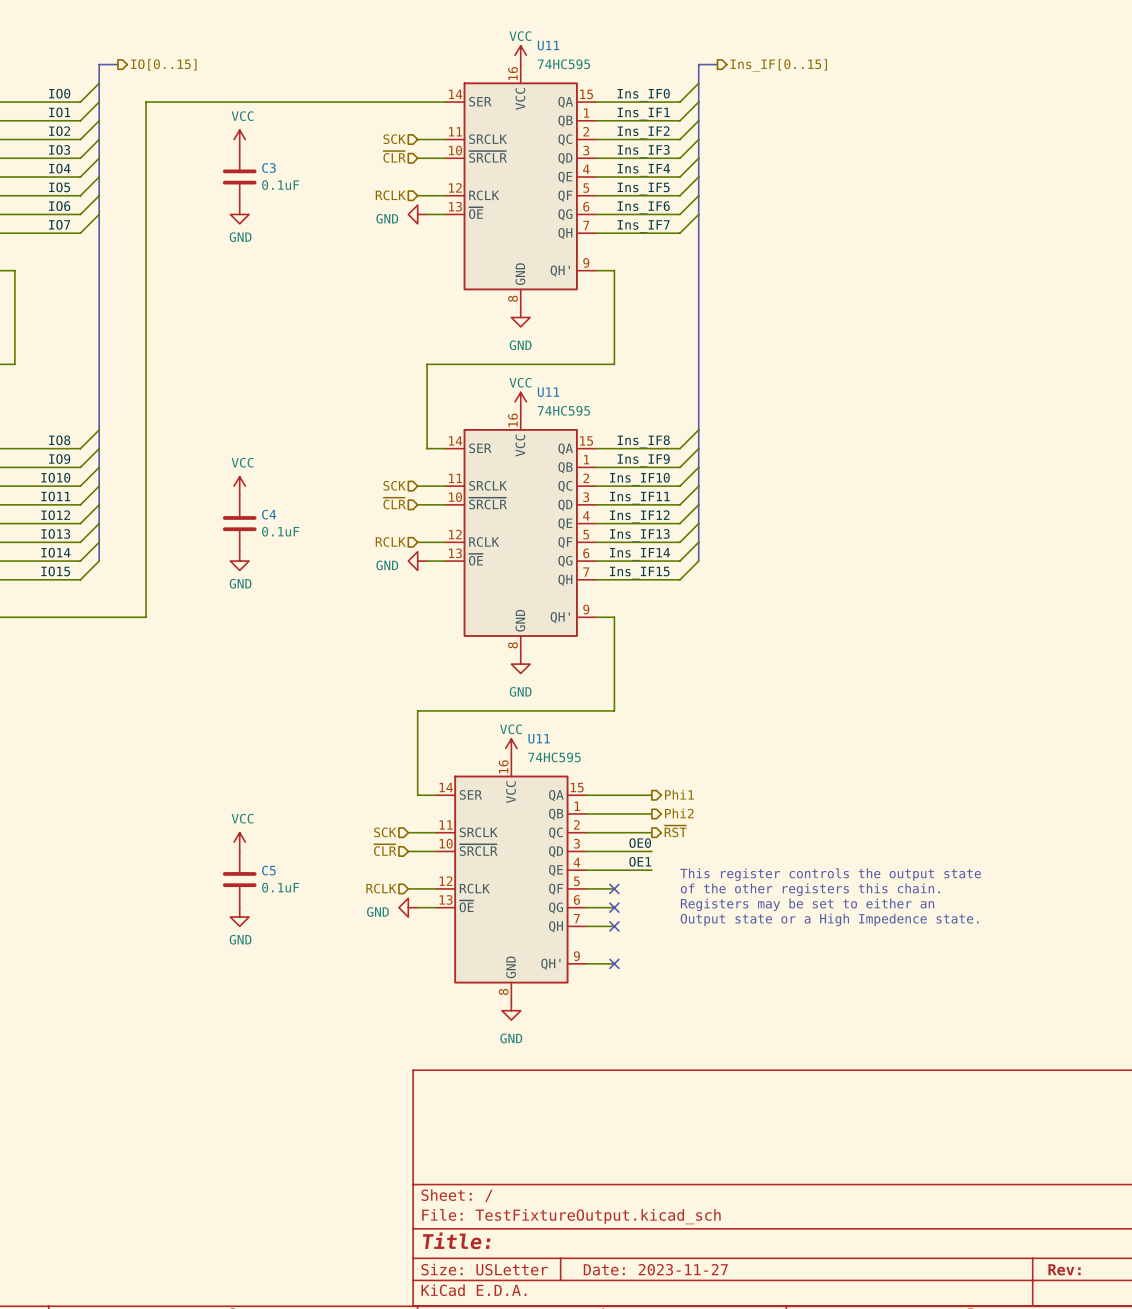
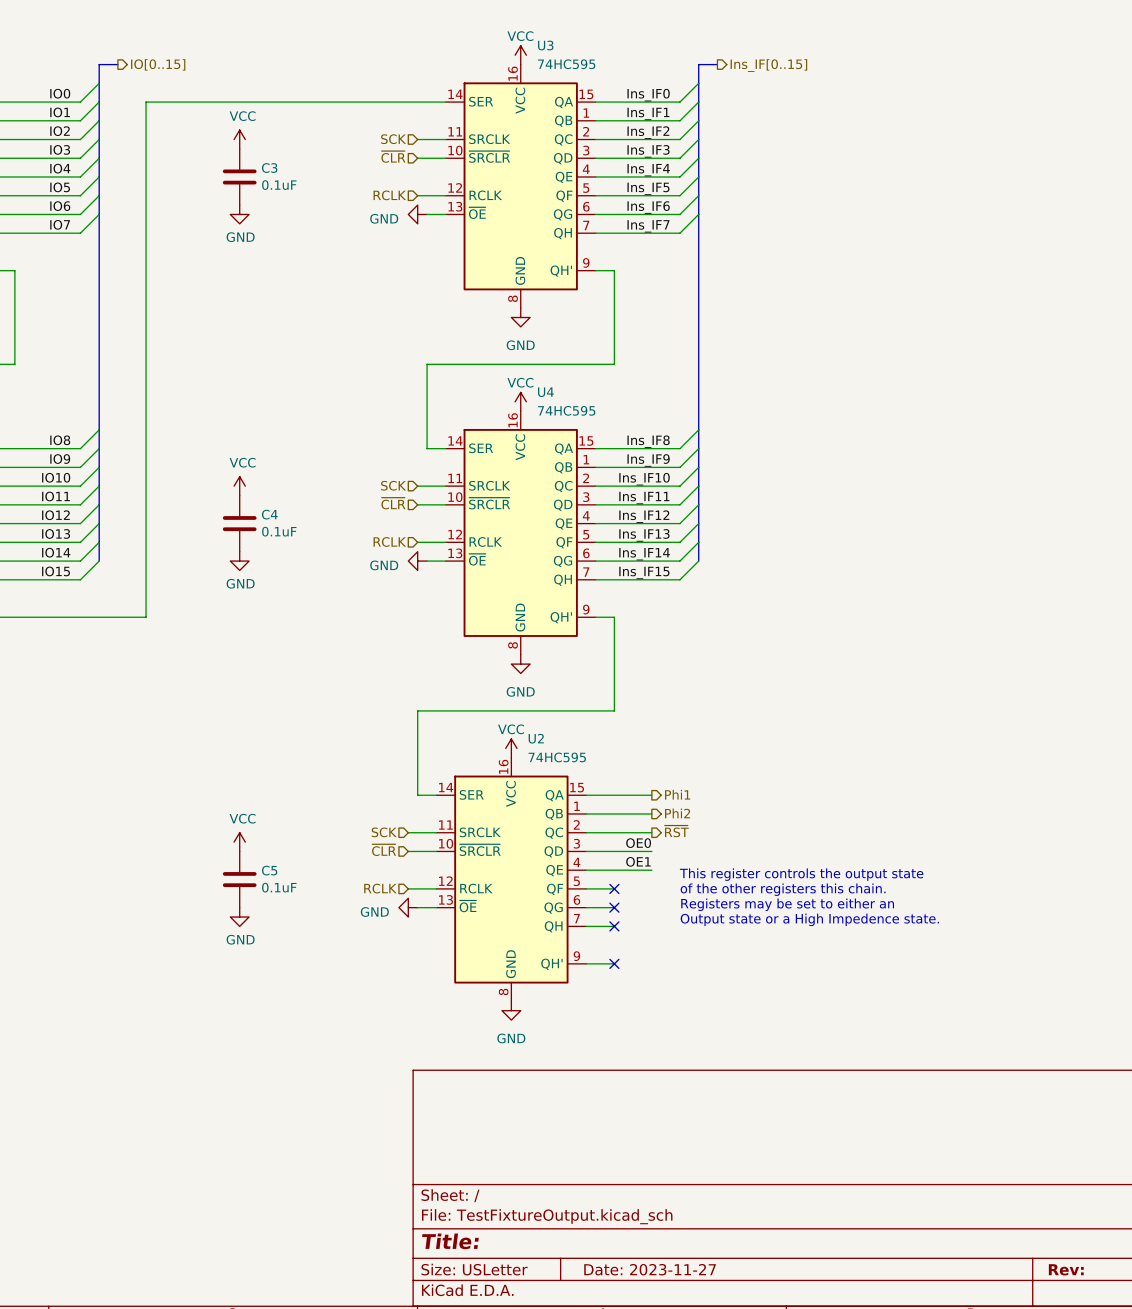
U11 name: U11 (548, 45) -> U3 (545, 45)
U11 name: U11 (548, 392) -> U4 (545, 392)
U11 name: U11 (539, 738) -> U2 (536, 738)

